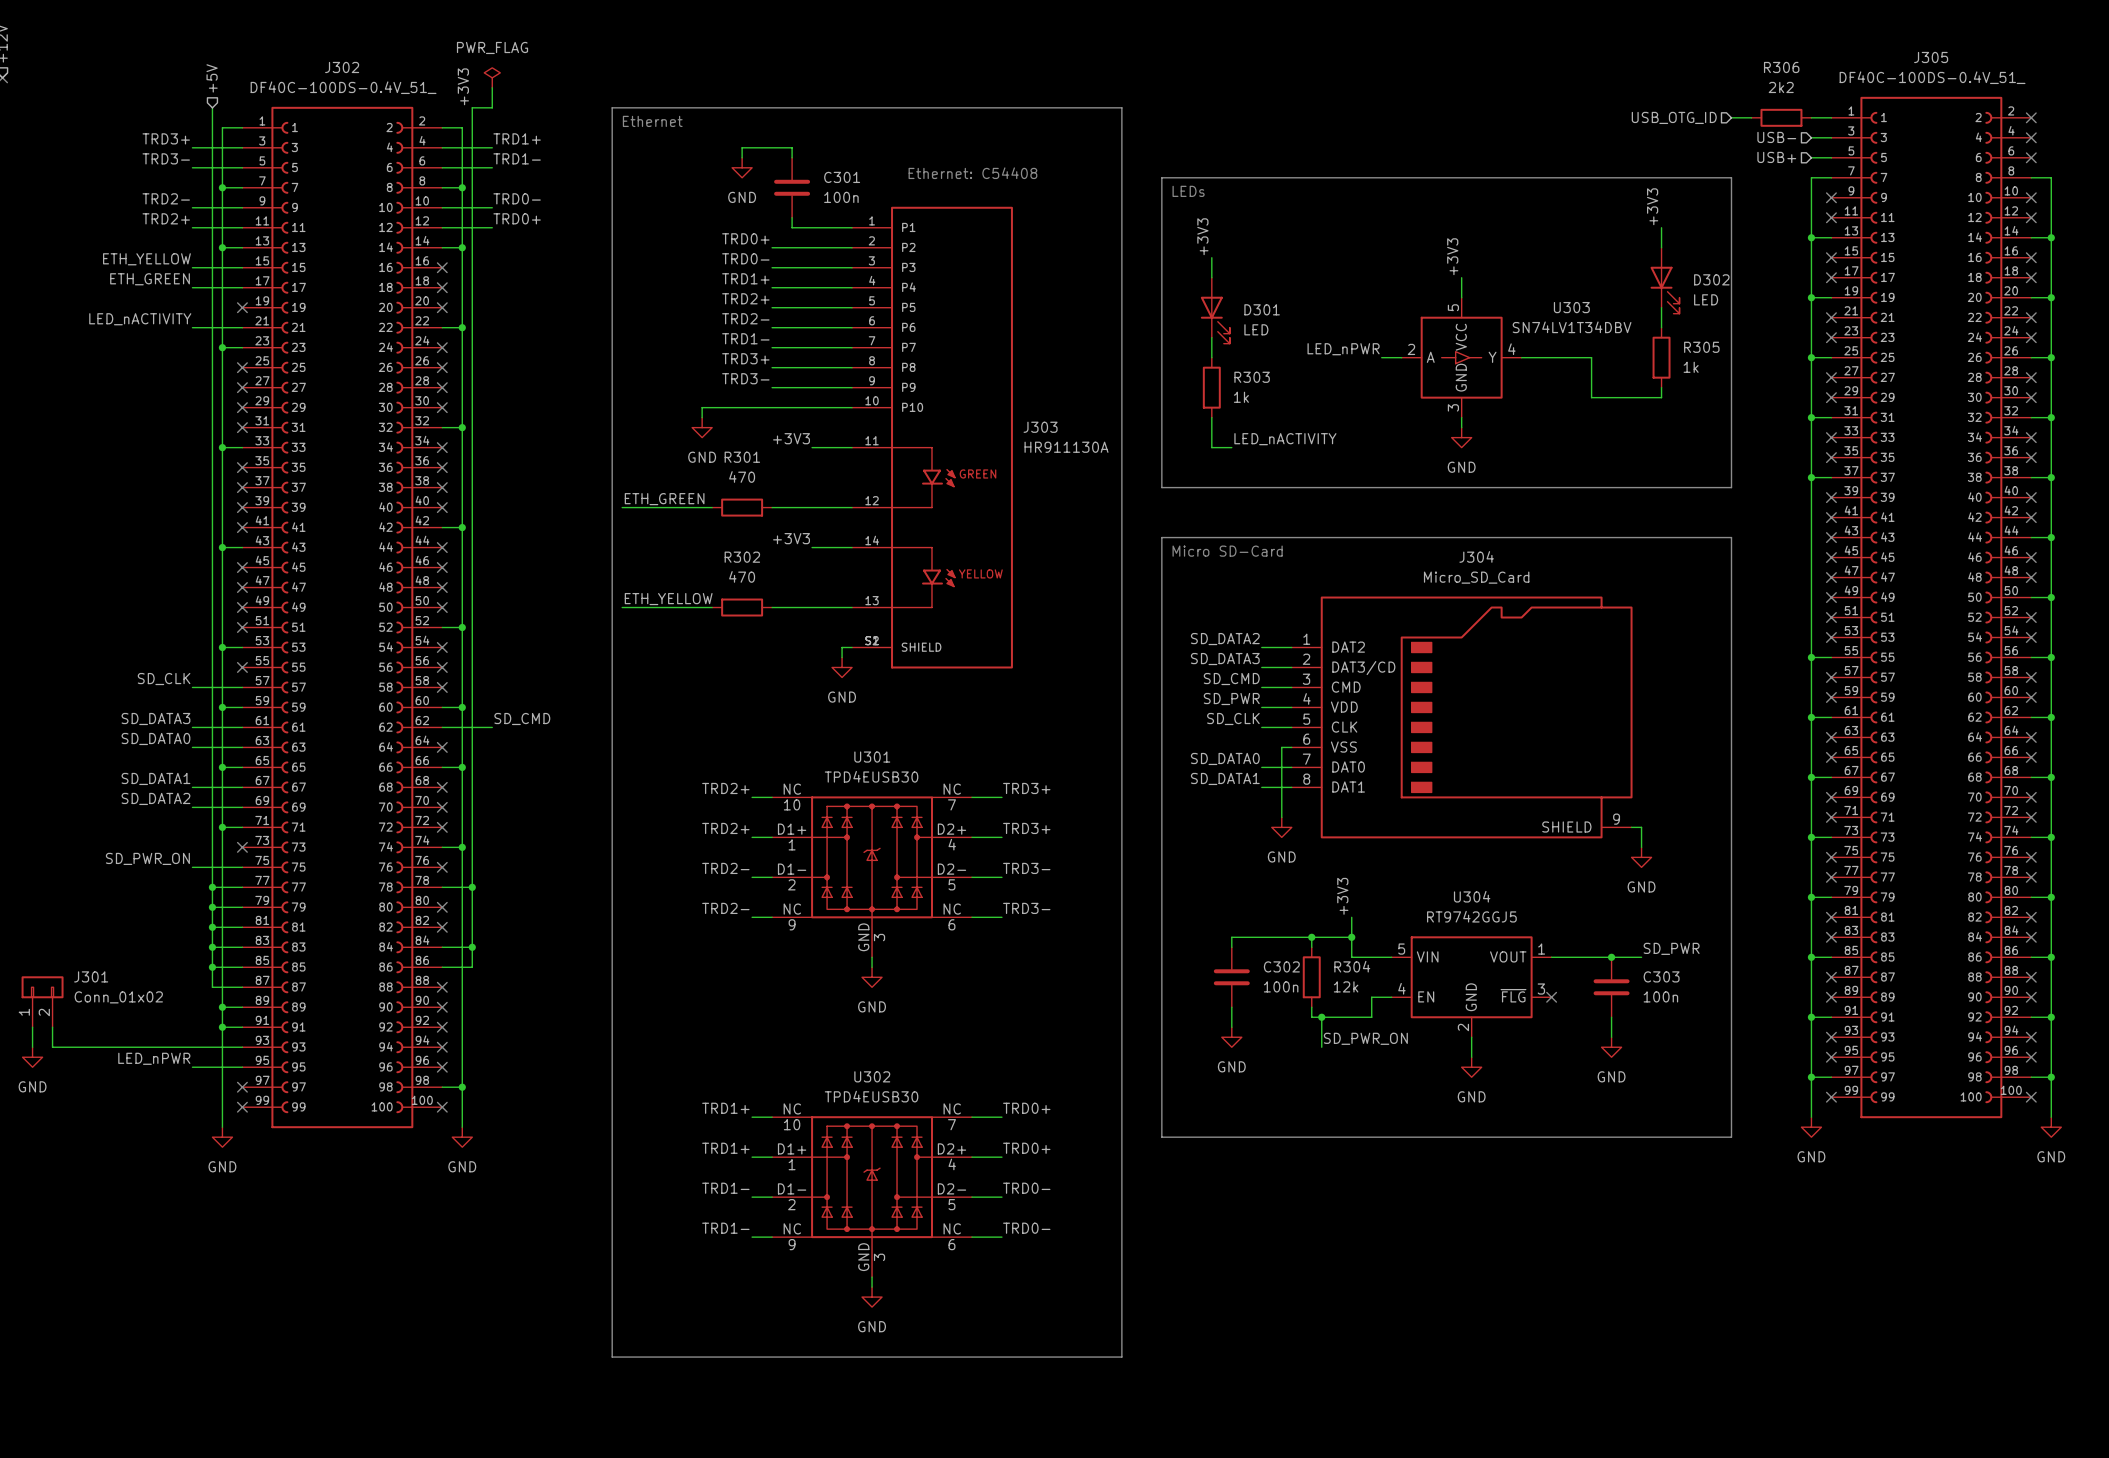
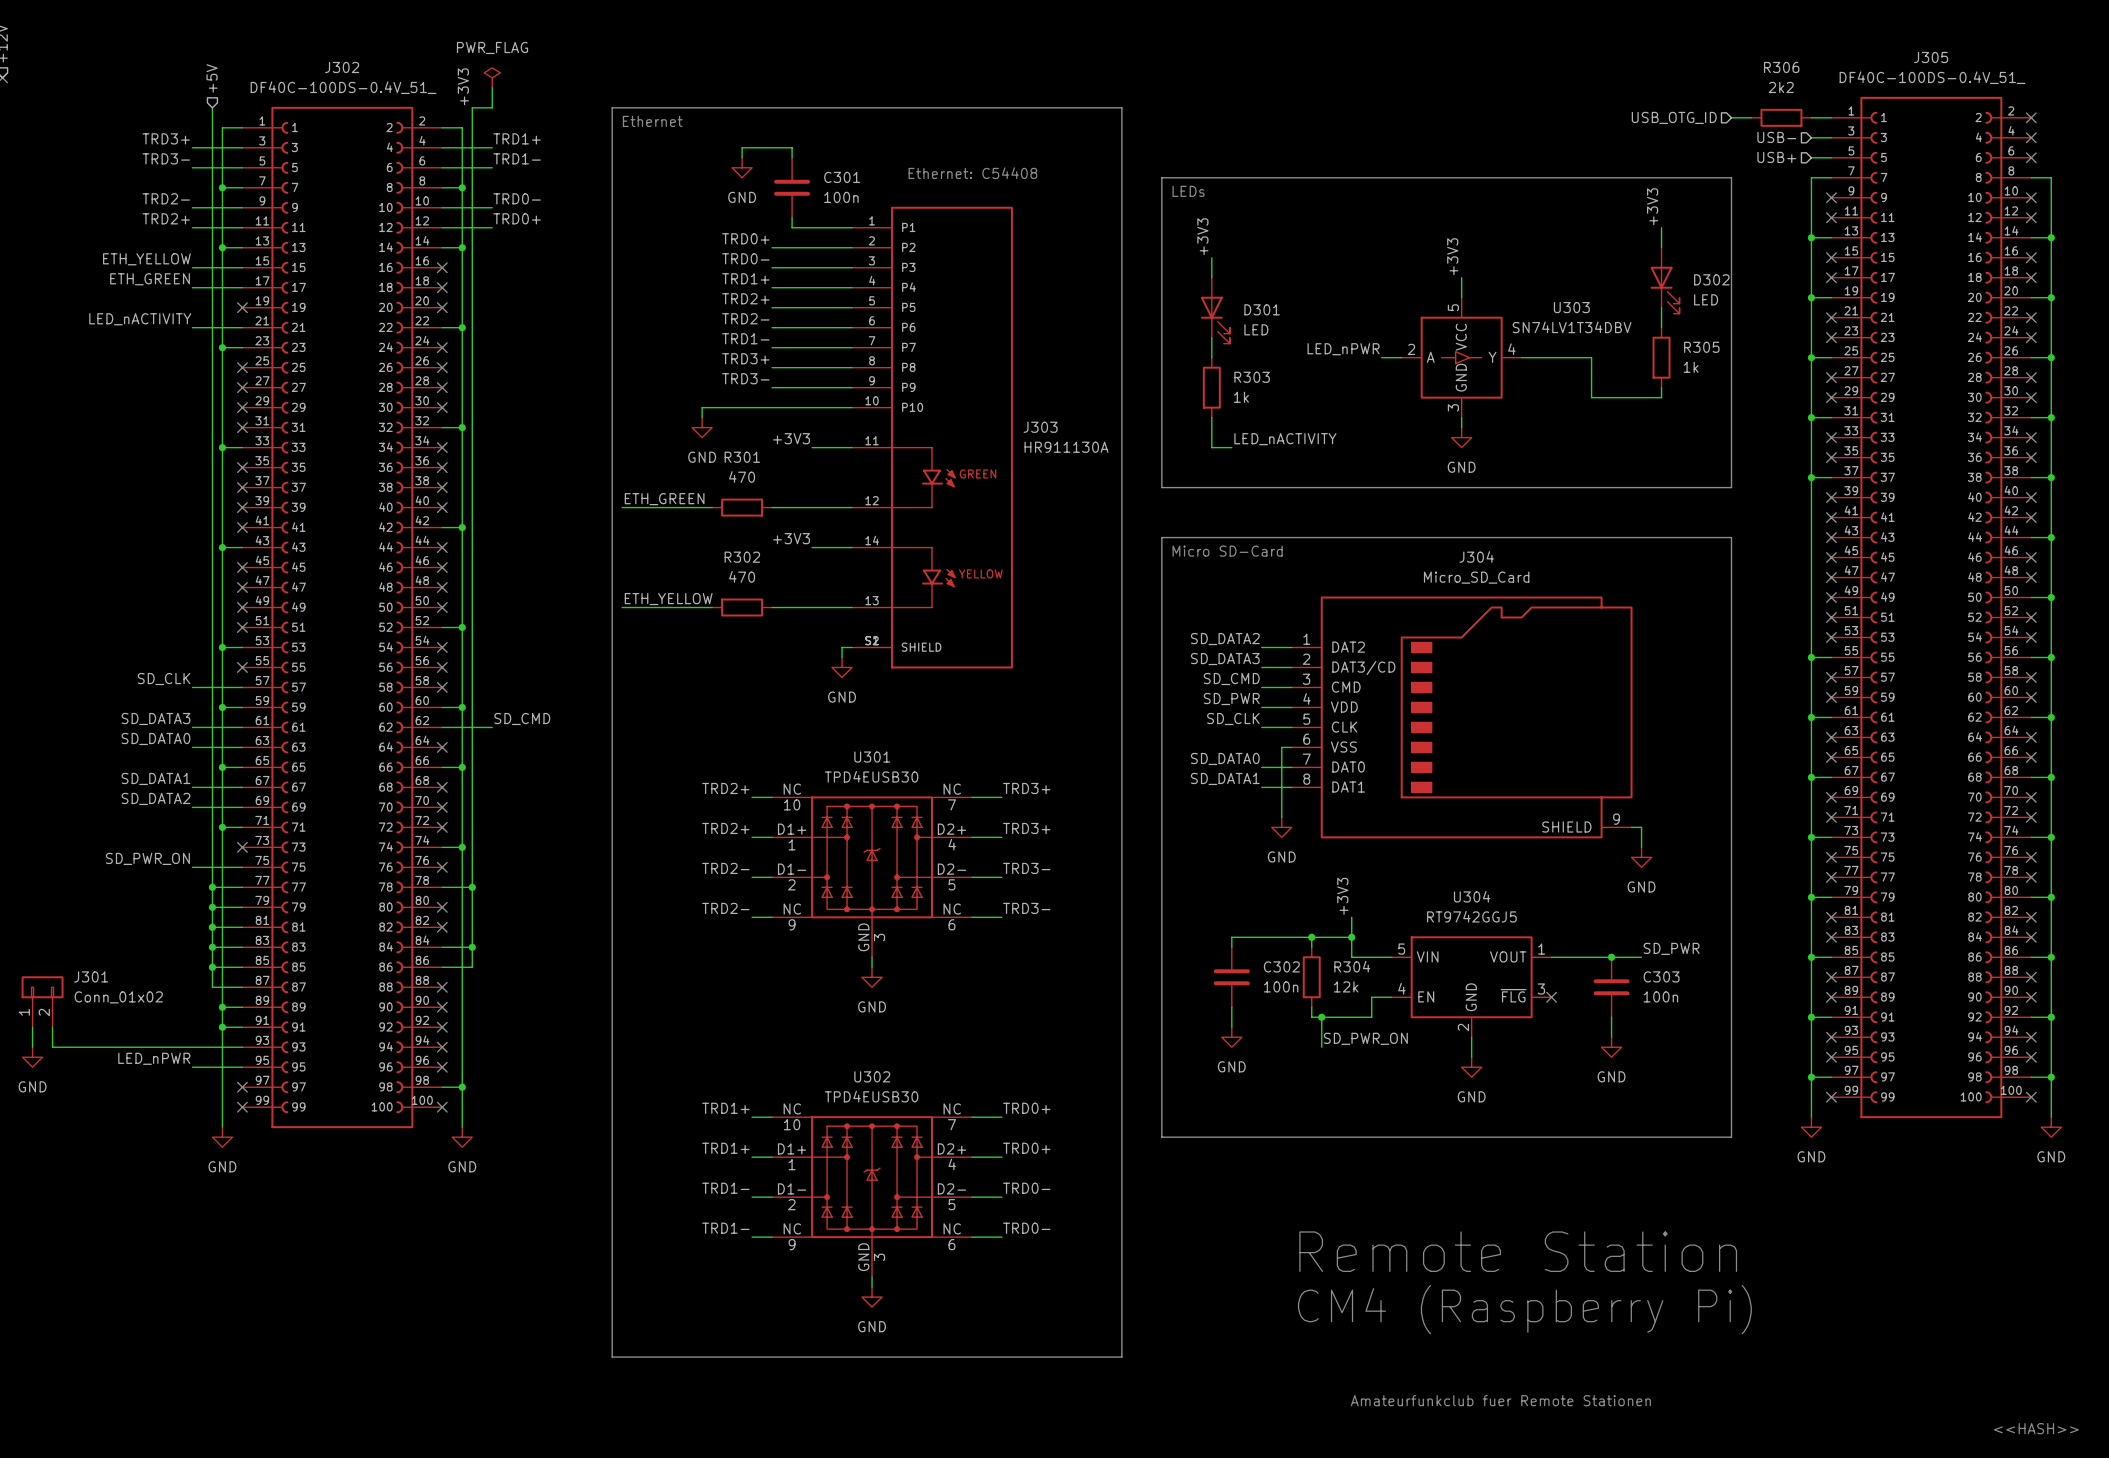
text: none -> Remote Station (1518, 1251)
text: none -> CM4 (Raspberry Pi) (1524, 1309)
text: none -> Amateurfunkclub fuer Remote Stationen (1500, 1400)
text: none -> <<HASH>> (2036, 1428)

